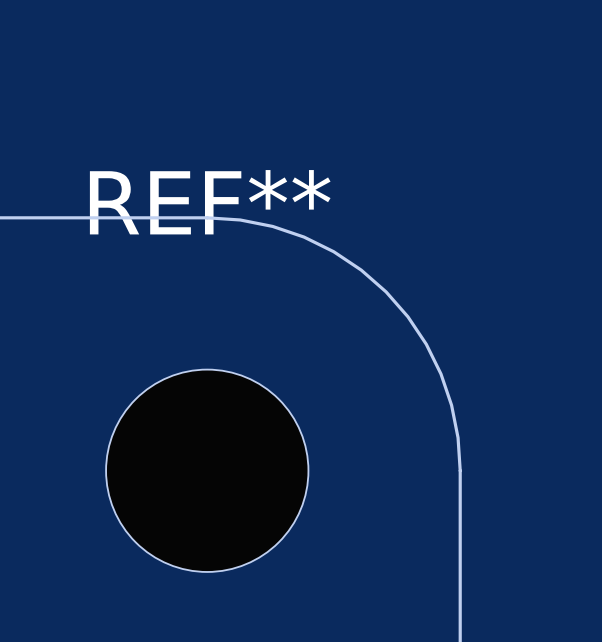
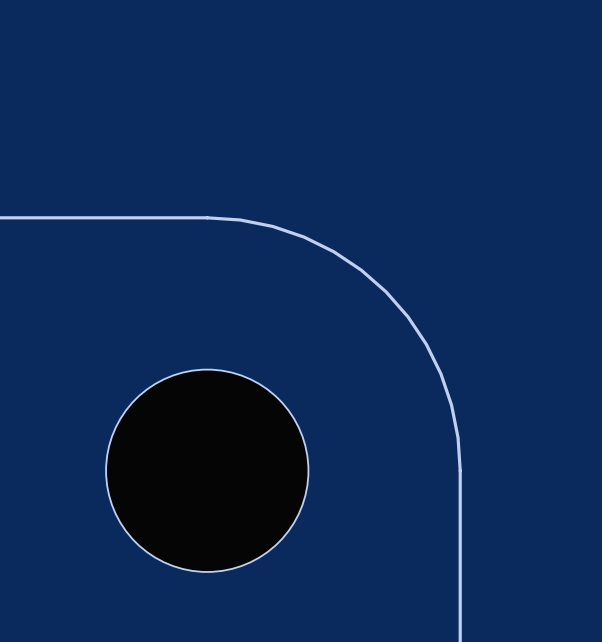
REF** name: REF** (210, 202) -> none

